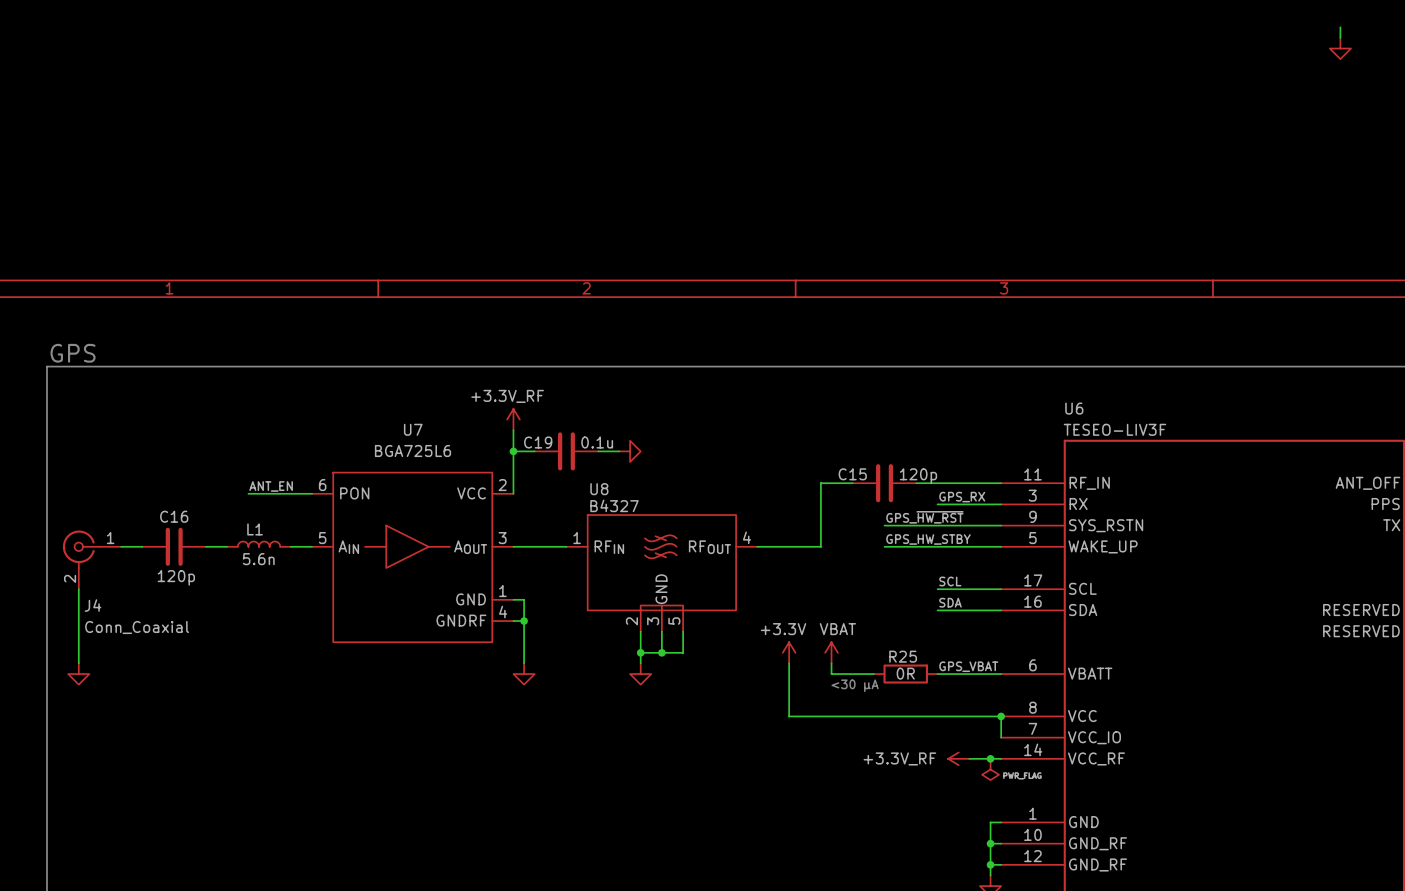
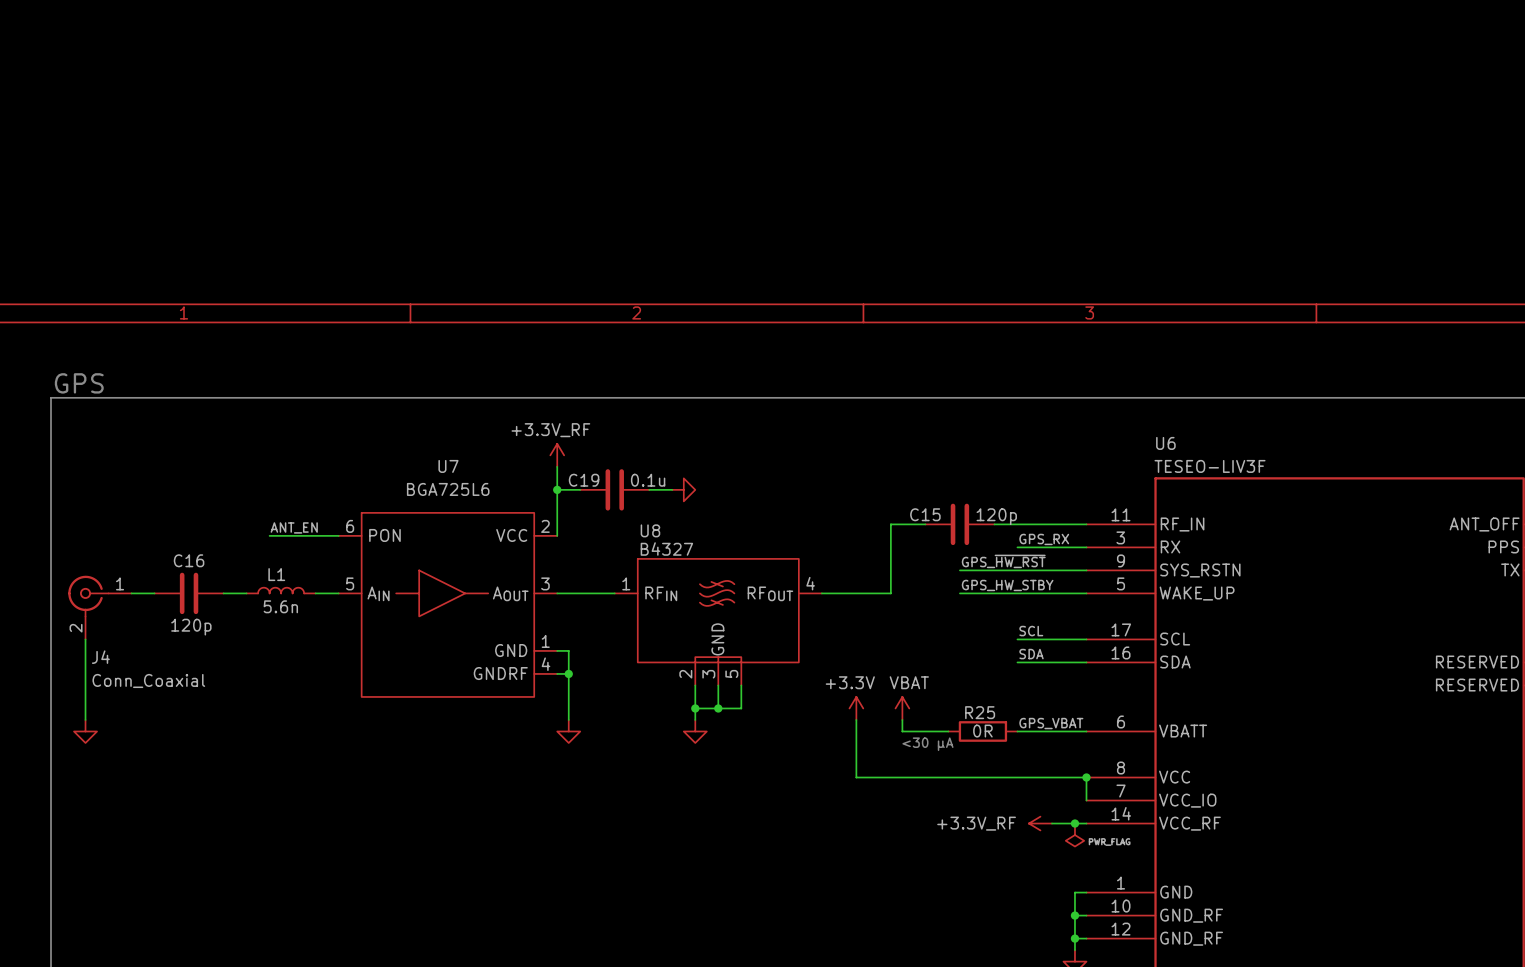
wire: (1340, 27) (1340, 37) -> none
power symbol: (1340, 48) -> none

